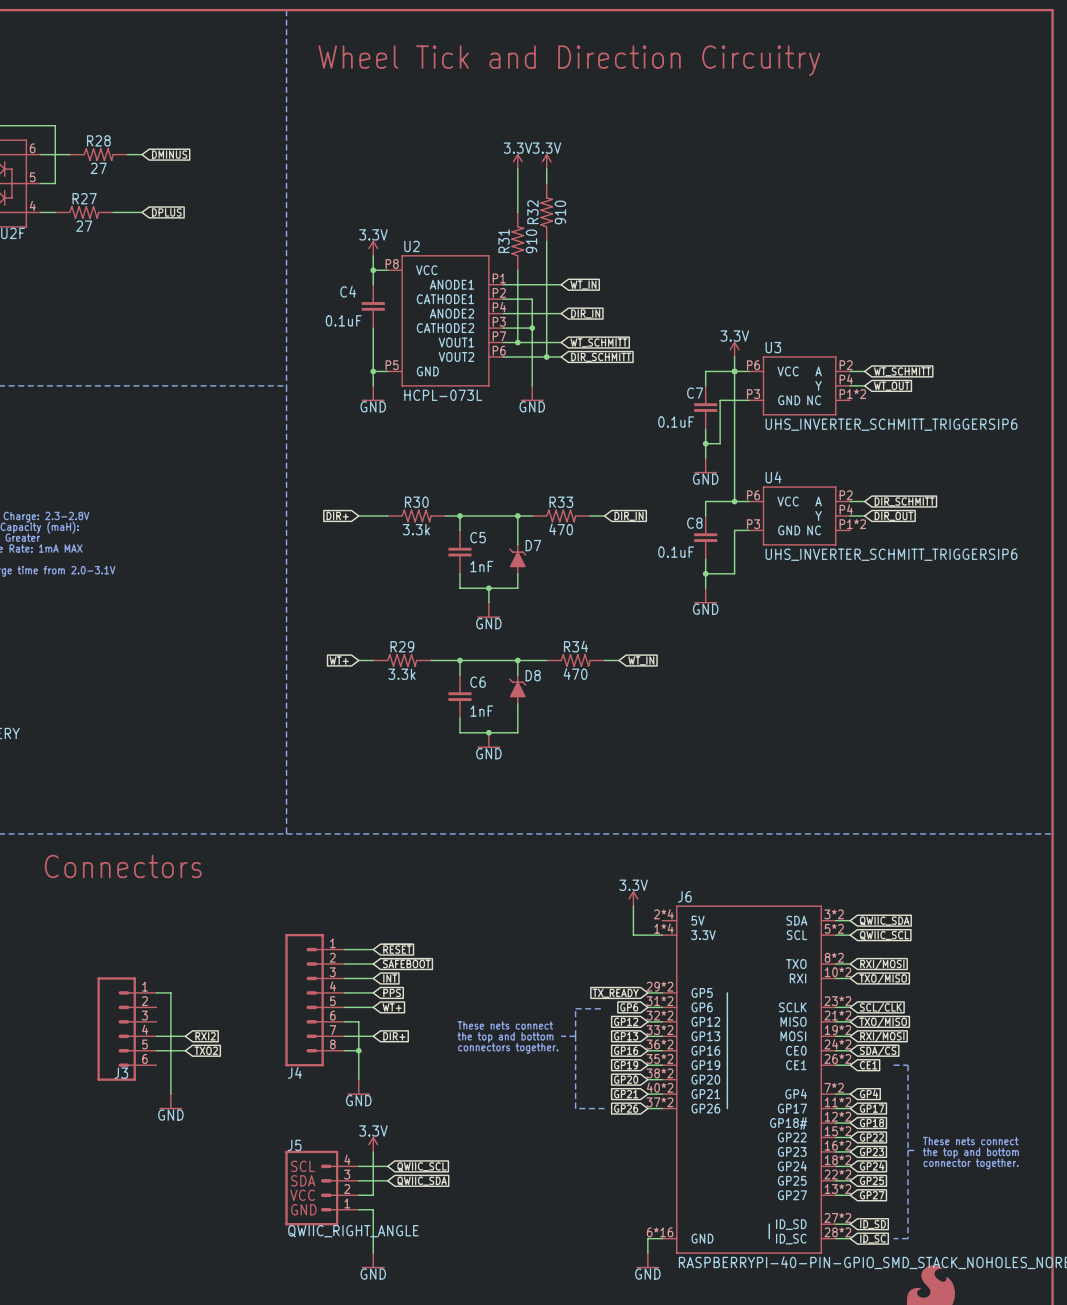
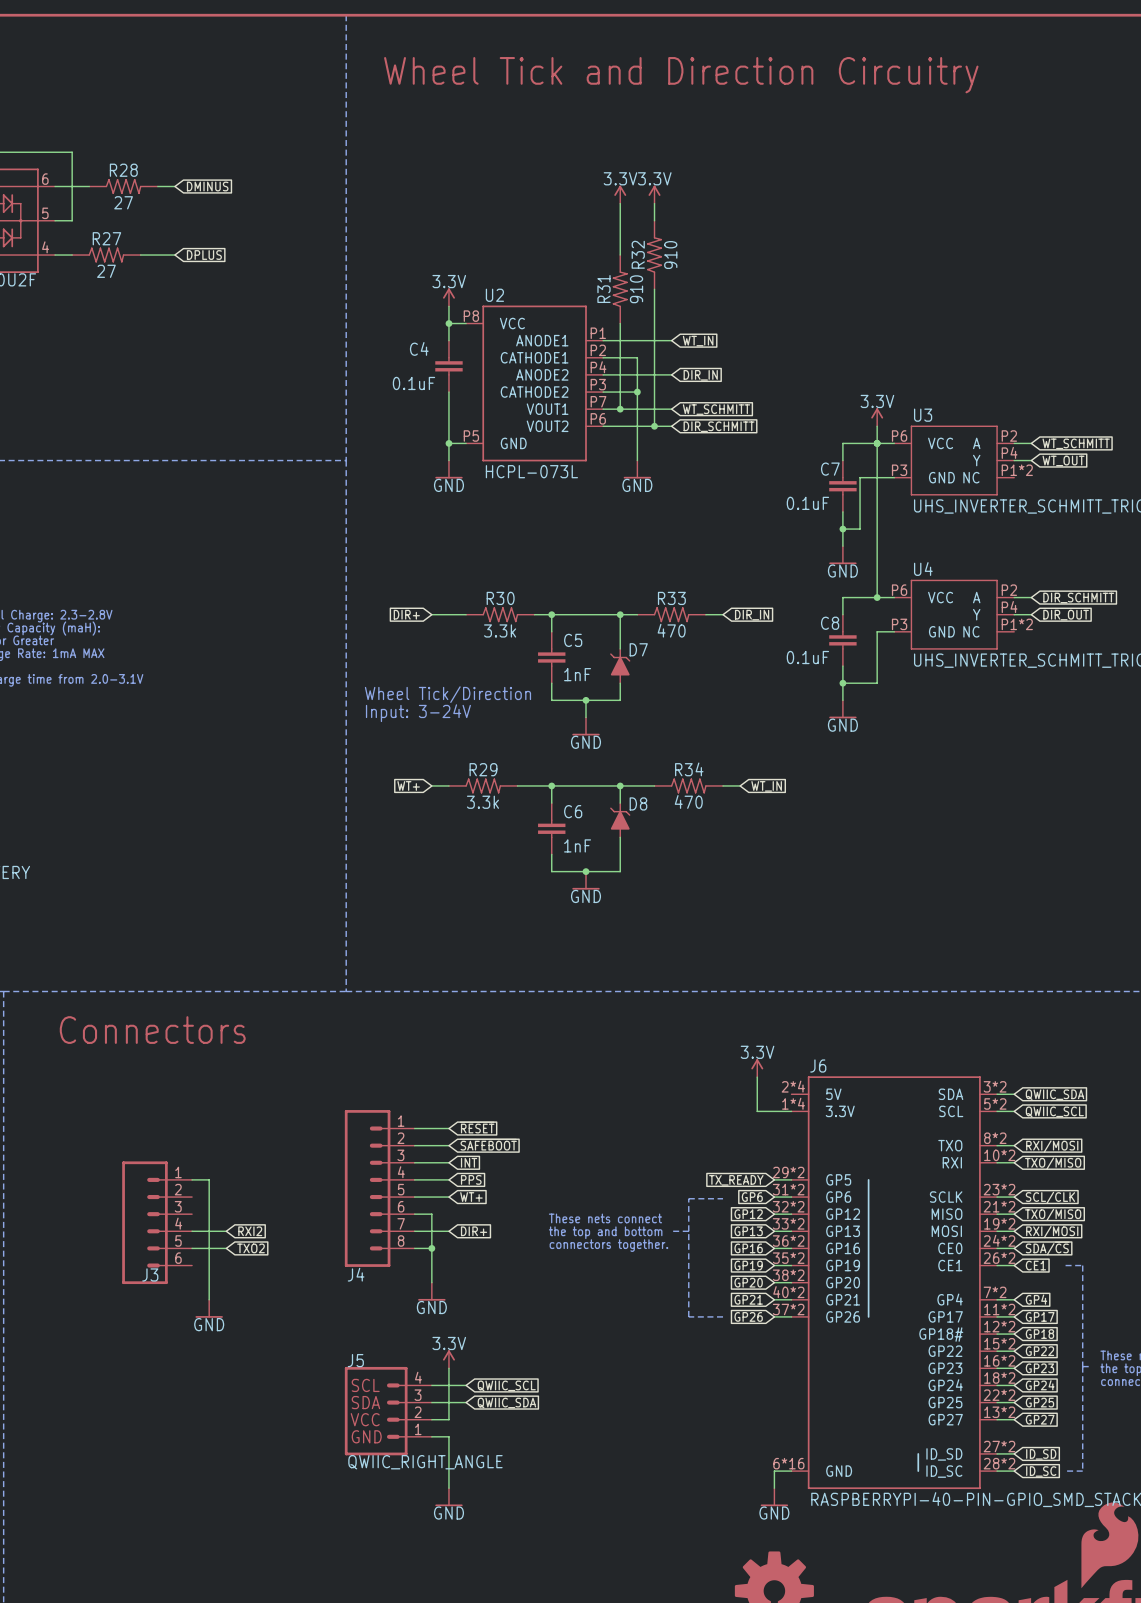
text: none -> Wheel Tick/Direction (447, 694)
text: none -> Input: 3-24V (418, 713)

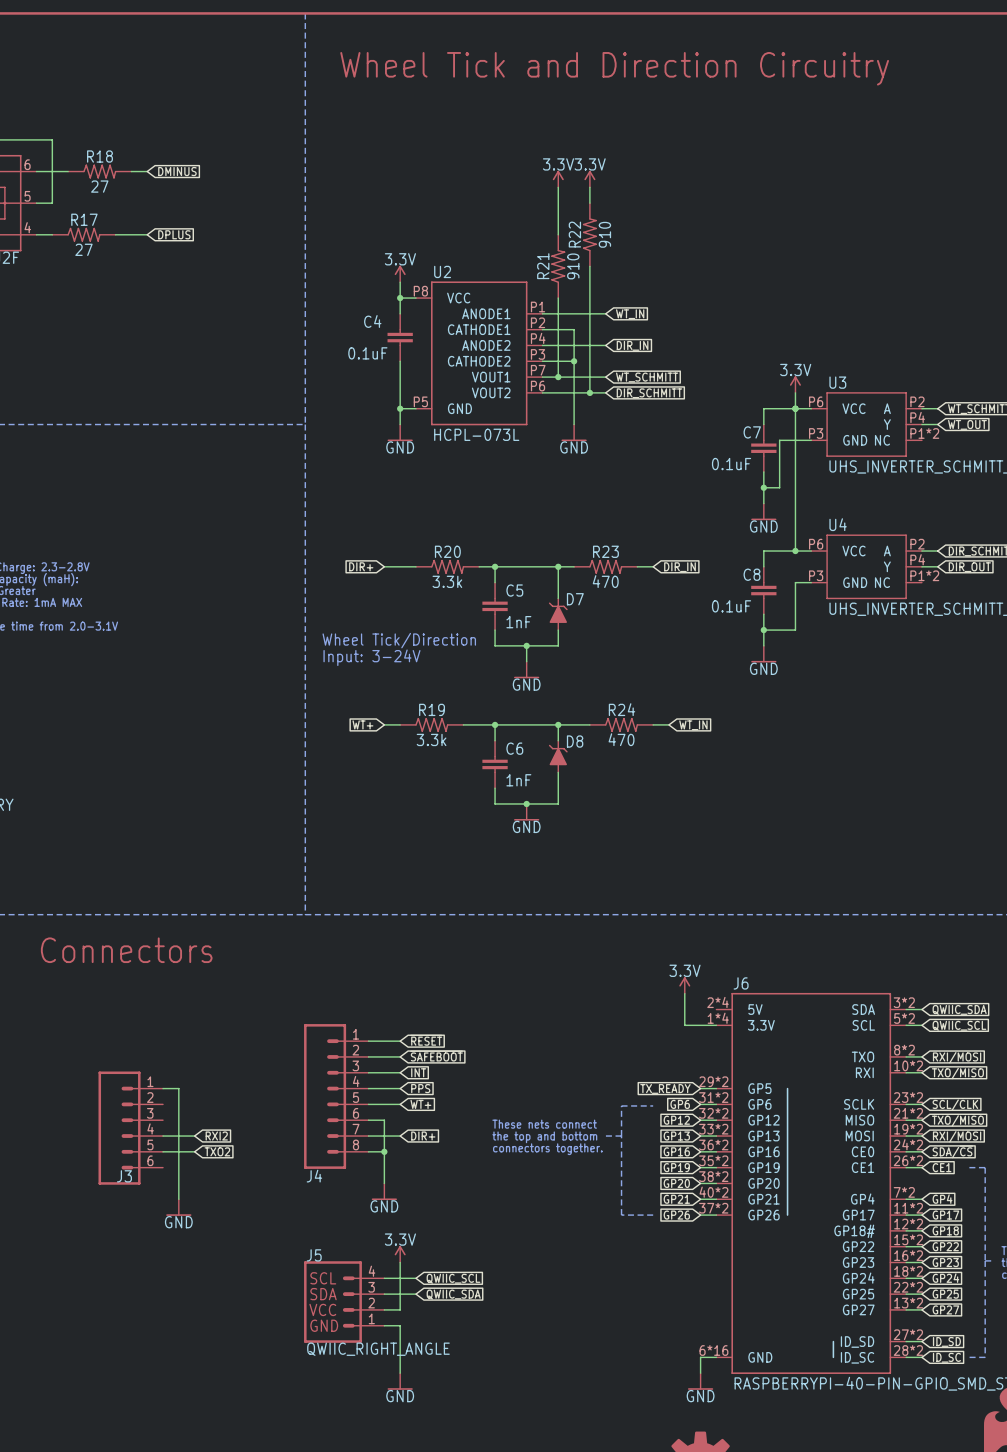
R28 name: R28 (123, 170) -> R18 (100, 156)
R27 name: R27 (106, 238) -> R17 (84, 219)
R32 name: R32 (638, 254) -> R22 (574, 234)
R31 name: R31 (603, 289) -> R21 (543, 266)
R30 name: R30 (500, 598) -> R20 (447, 551)
R33 name: R33 (671, 598) -> R23 (605, 551)
R29 name: R29 (483, 769) -> R19 (432, 709)
R34 name: R34 (689, 769) -> R24 (622, 709)

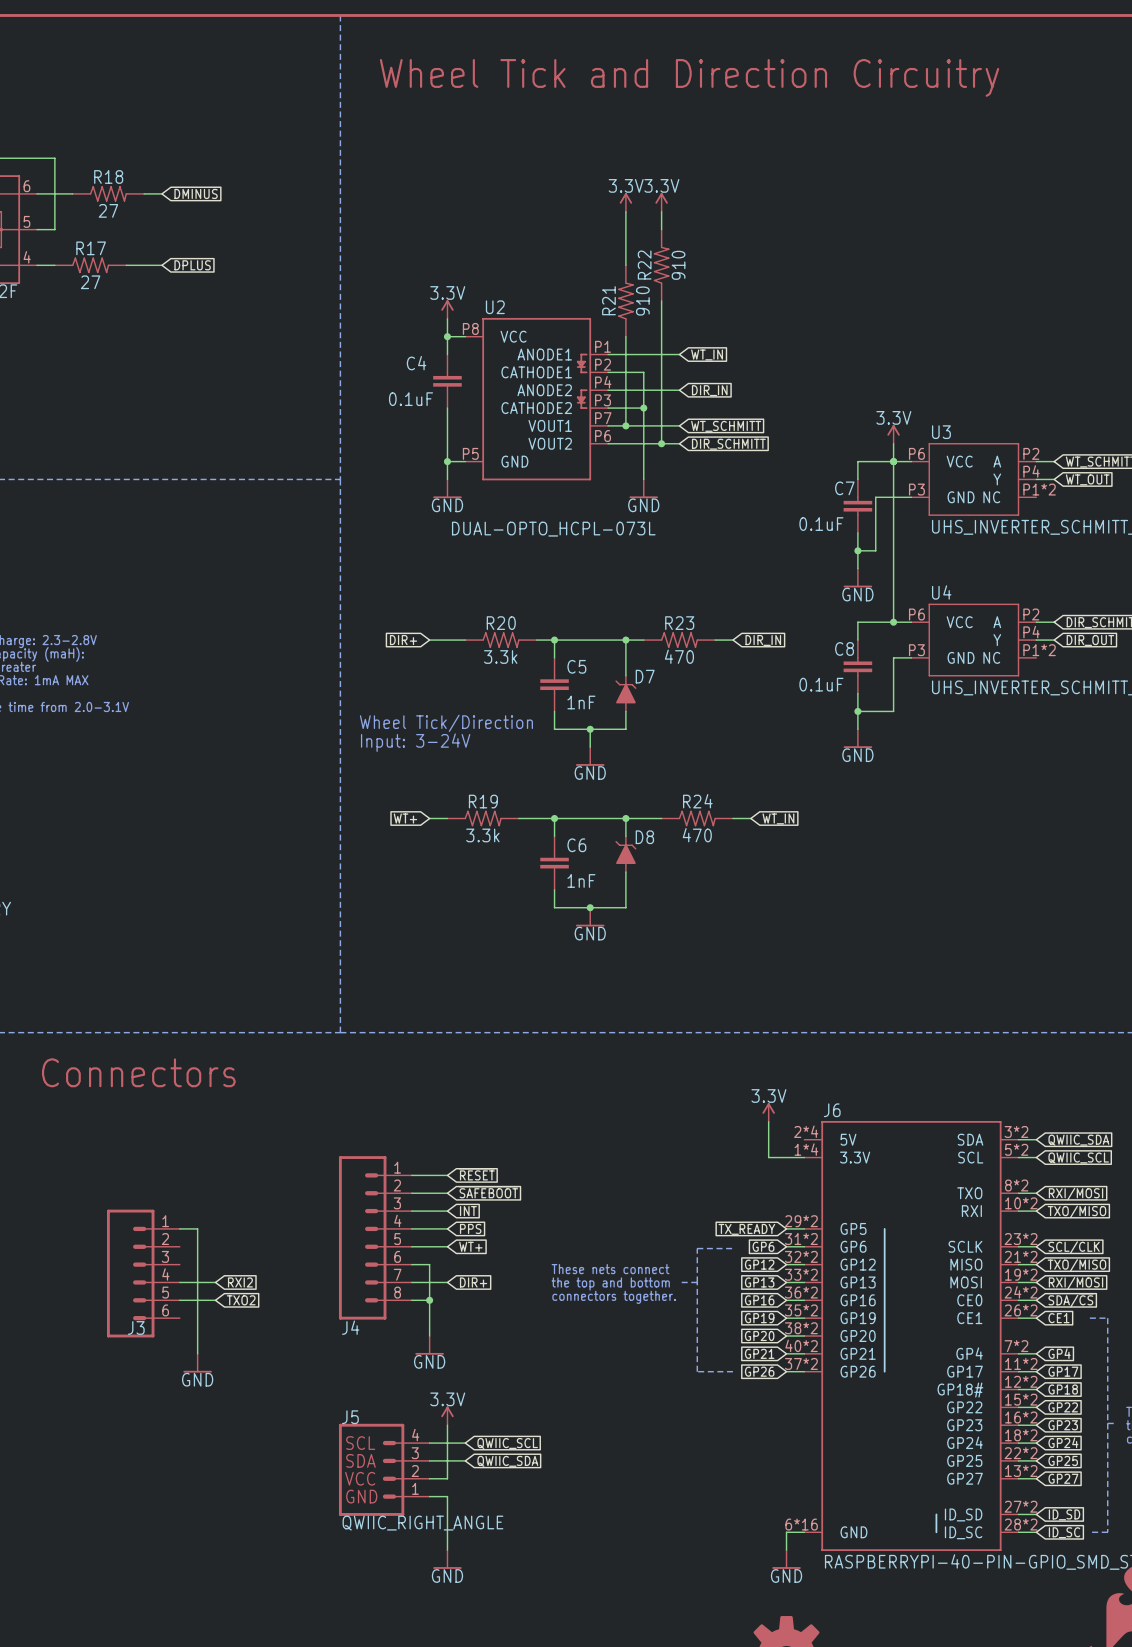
U2 symbol: [415, 281, 543, 426] -> [465, 317, 609, 481]
U2 value: HCPL-073L (476, 434) -> DUAL-OPTO_HCPL-073L (553, 529)

